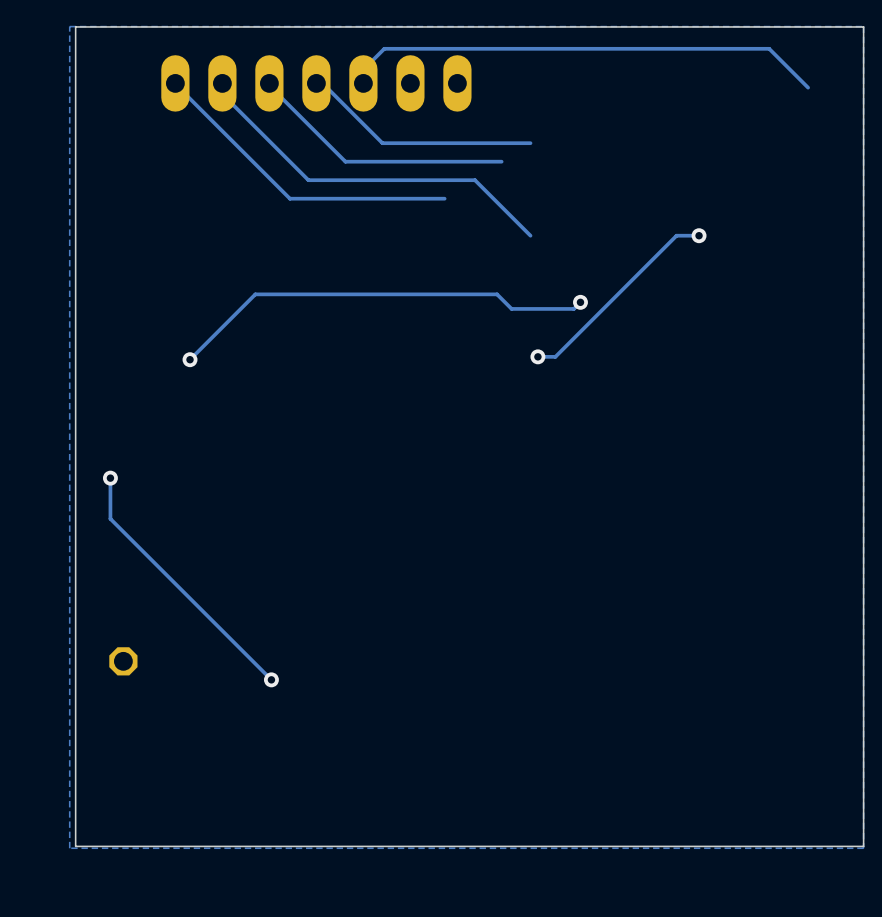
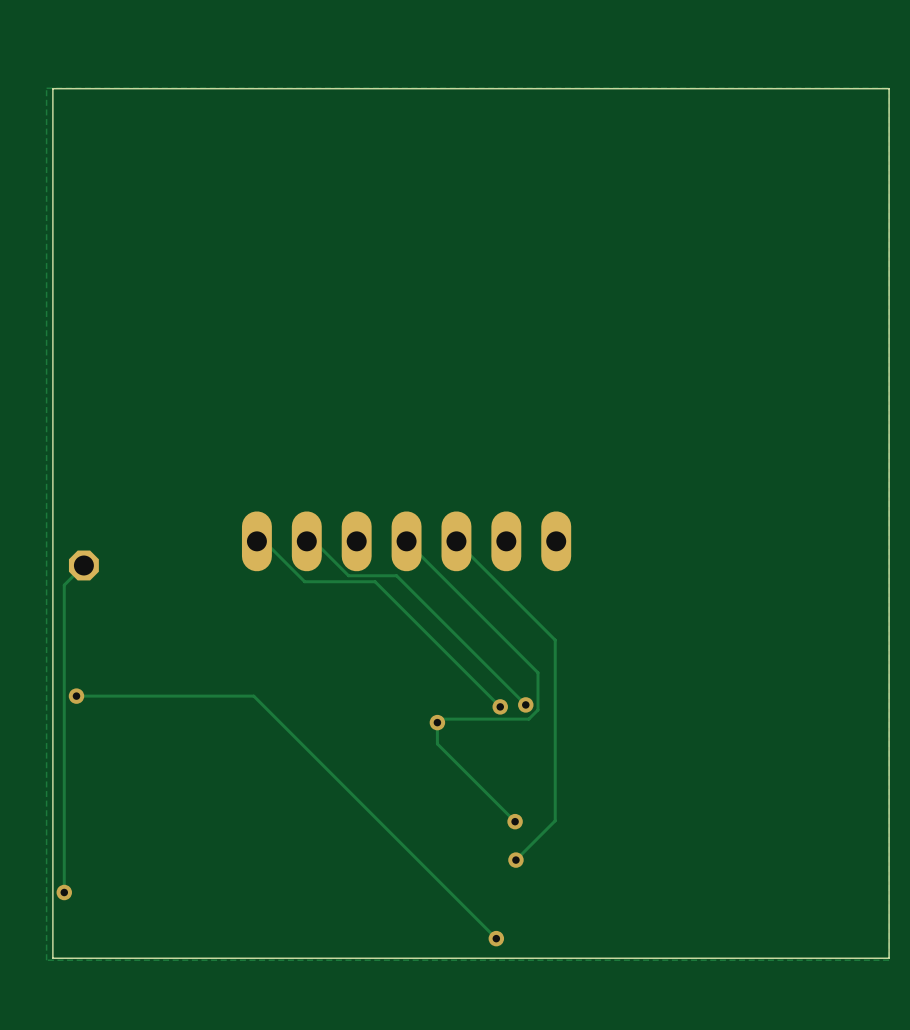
track: (175, 83) (289, 198) (444, 198) -> none
track: (222, 83) (215, 87) (308, 180) (475, 180) (530, 235) -> none
track: (269, 83) (271, 87) (345, 161) (501, 161) -> none
track: (316, 83) (326, 87) (382, 143) (530, 143) -> none
part position: (316, 83) -> (406, 541)
track: (363, 83) (363, 69) (384, 48) (769, 48) (808, 87) -> none
track: (699, 235) (676, 235) (555, 356) (537, 356) -> none
via: (699, 235) -> none
track: (580, 302) (573, 308) (511, 308) (497, 294) (255, 294) (190, 359) -> none
via: (580, 302) -> none
via: (537, 356) -> none
via: (190, 359) -> none
track: none -> (256, 541) (264, 541) (304, 581) (375, 581) (500, 706)
track: none -> (306, 541) (314, 541) (348, 575) (396, 575) (525, 704)
track: none -> (406, 541) (537, 672) (537, 709) (528, 719) (440, 719) (437, 722) (437, 743) (515, 821)
track: none -> (456, 541) (555, 640) (555, 820) (515, 860)
track: none -> (83, 565) (64, 585) (64, 892)
track: (110, 478) (110, 518) (271, 679) -> none
via: (110, 478) -> none
track: none -> (76, 696) (253, 696) (496, 938)
via: none -> (76, 696)
via: none -> (525, 704)
via: none -> (500, 706)
via: none -> (437, 722)
part position: (123, 661) -> (83, 565)
via: (271, 679) -> none
via: none -> (515, 821)
via: none -> (515, 860)
via: none -> (64, 892)
via: none -> (496, 938)

